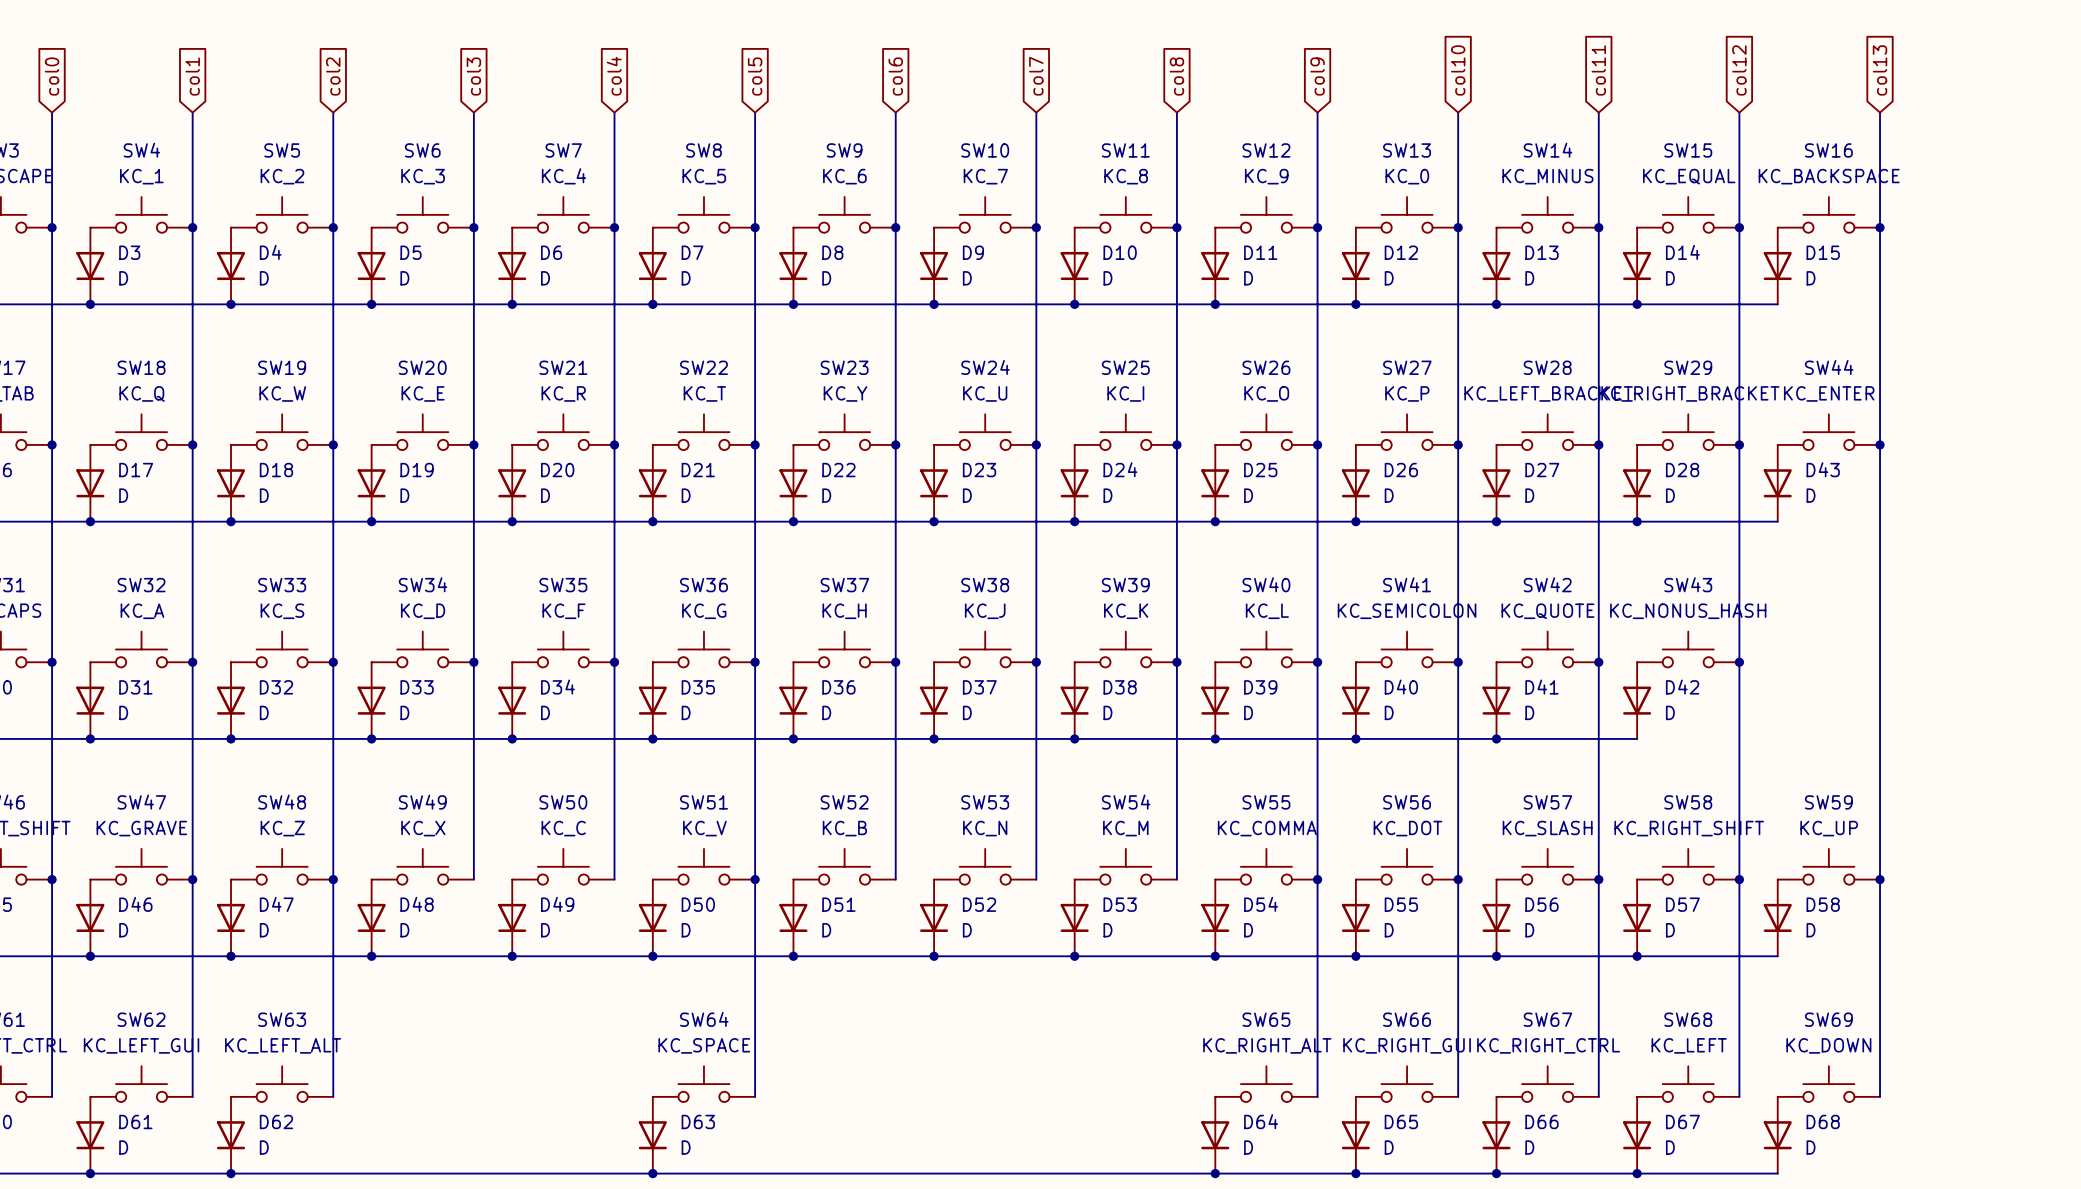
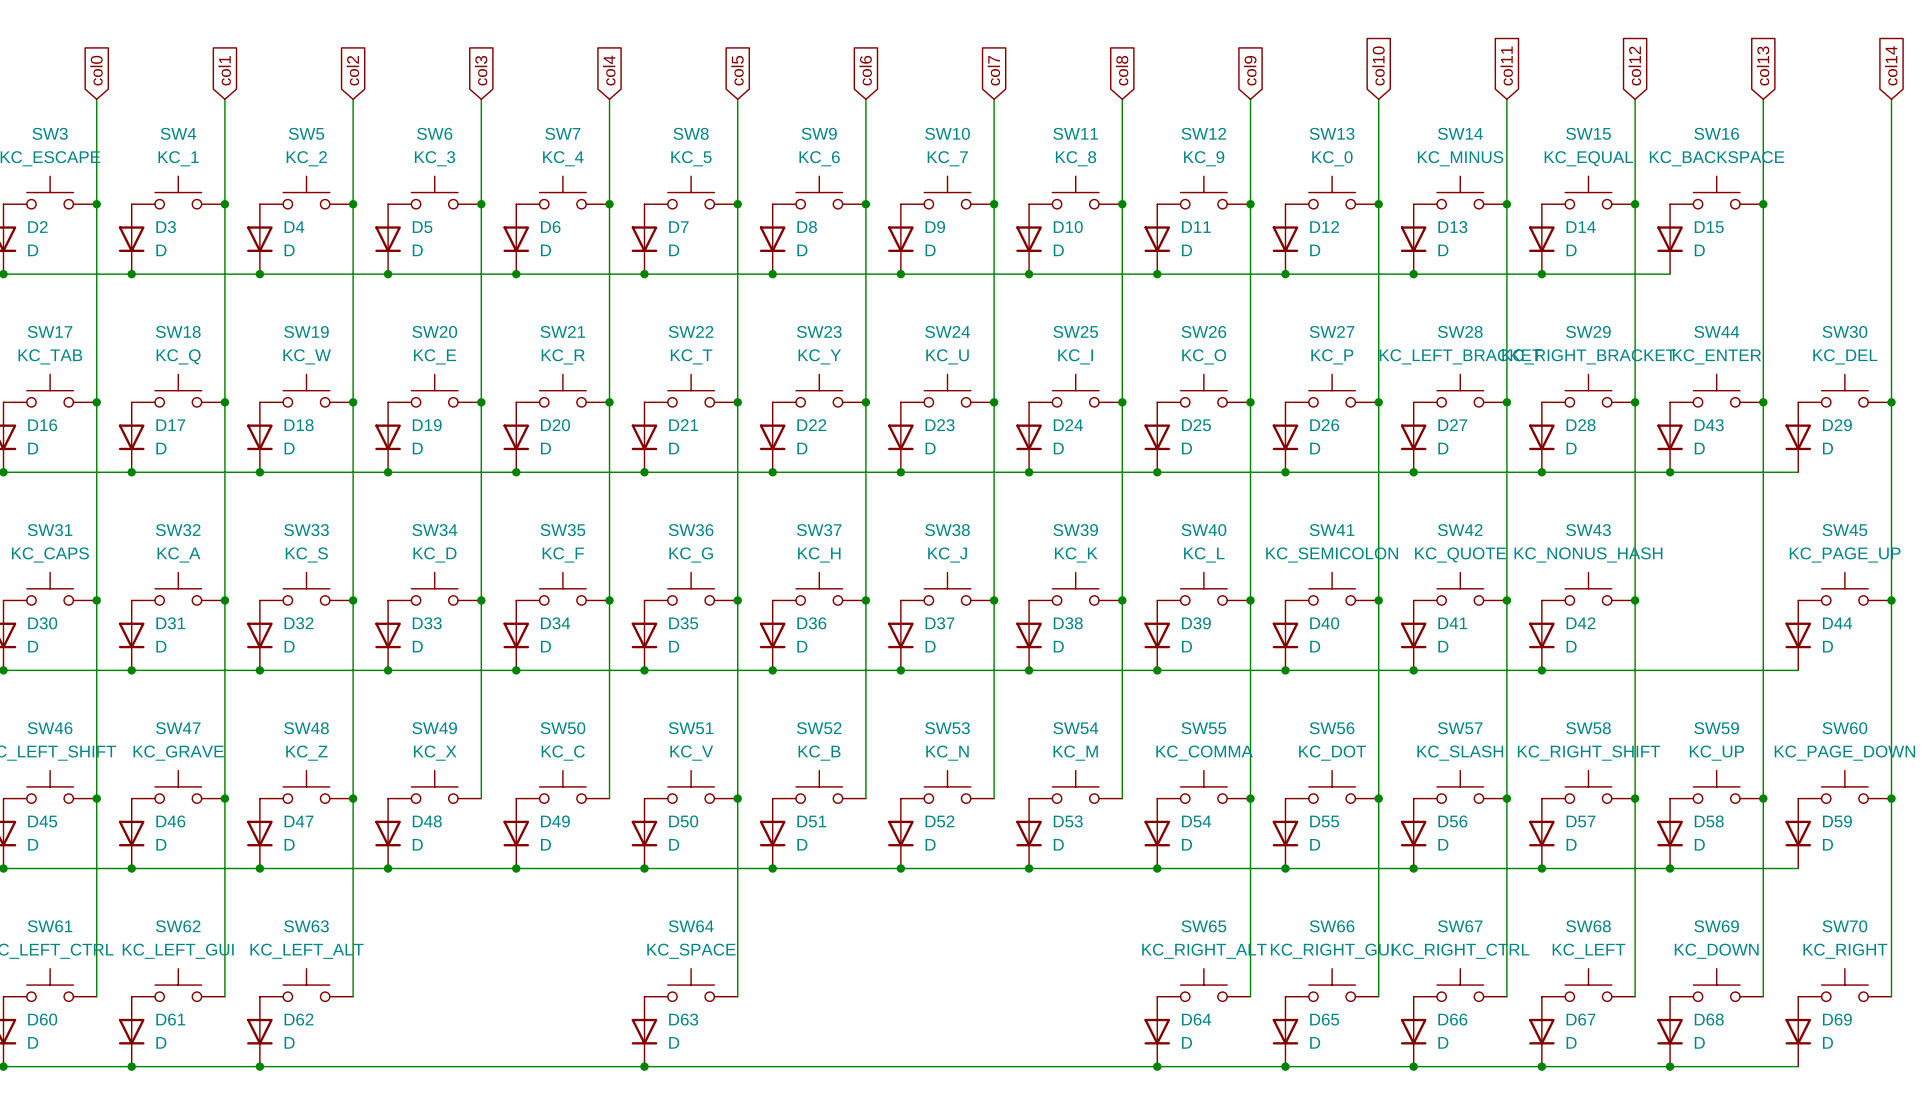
global label: none -> col14 (1891, 65)
wire: none -> (1891, 99) (1891, 996)
SW30: none -> KC_DEL (1844, 390)
junction: none -> (1891, 402)
D29: none -> D (1798, 437)
wire: none -> (1670, 472) (1798, 472)
junction: none -> (1670, 472)
SW45: none -> KC_PAGE_UP (1844, 588)
junction: none -> (1891, 600)
D44: none -> D (1798, 635)
wire: none -> (1541, 670) (1798, 670)
junction: none -> (1541, 670)
SW60: none -> KC_PAGE_DOWN (1844, 786)
junction: none -> (1891, 798)
D59: none -> D (1798, 833)
wire: none -> (1670, 868) (1798, 868)
junction: none -> (1670, 868)
SW70: none -> KC_RIGHT (1844, 985)
D69: none -> D (1798, 1031)
wire: none -> (1670, 1066) (1798, 1066)
junction: none -> (1670, 1066)

